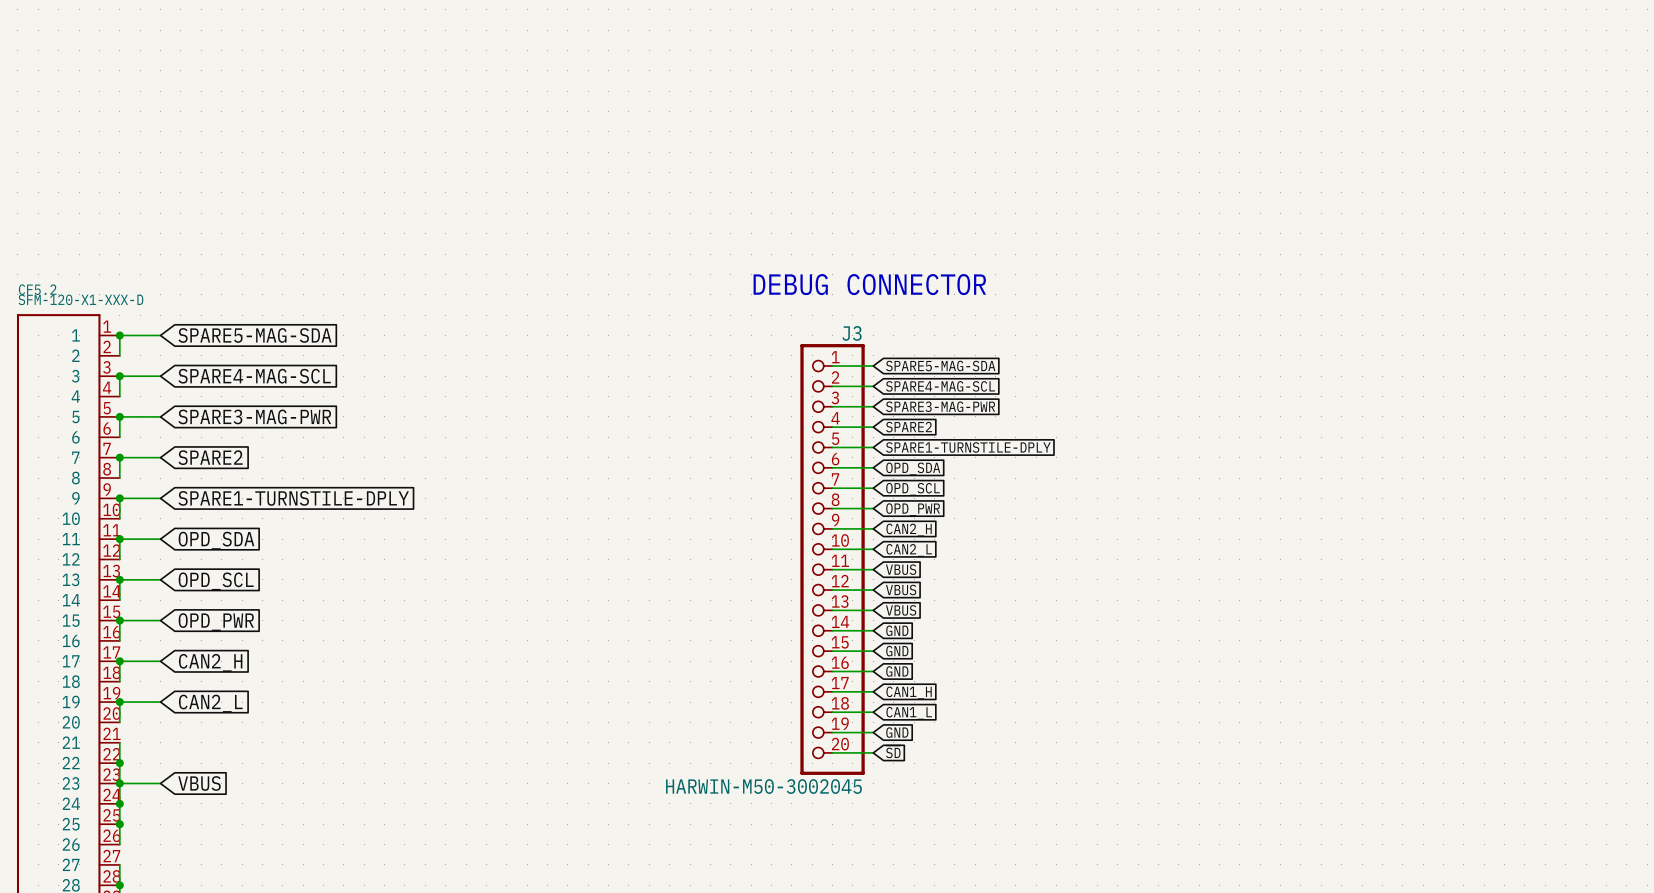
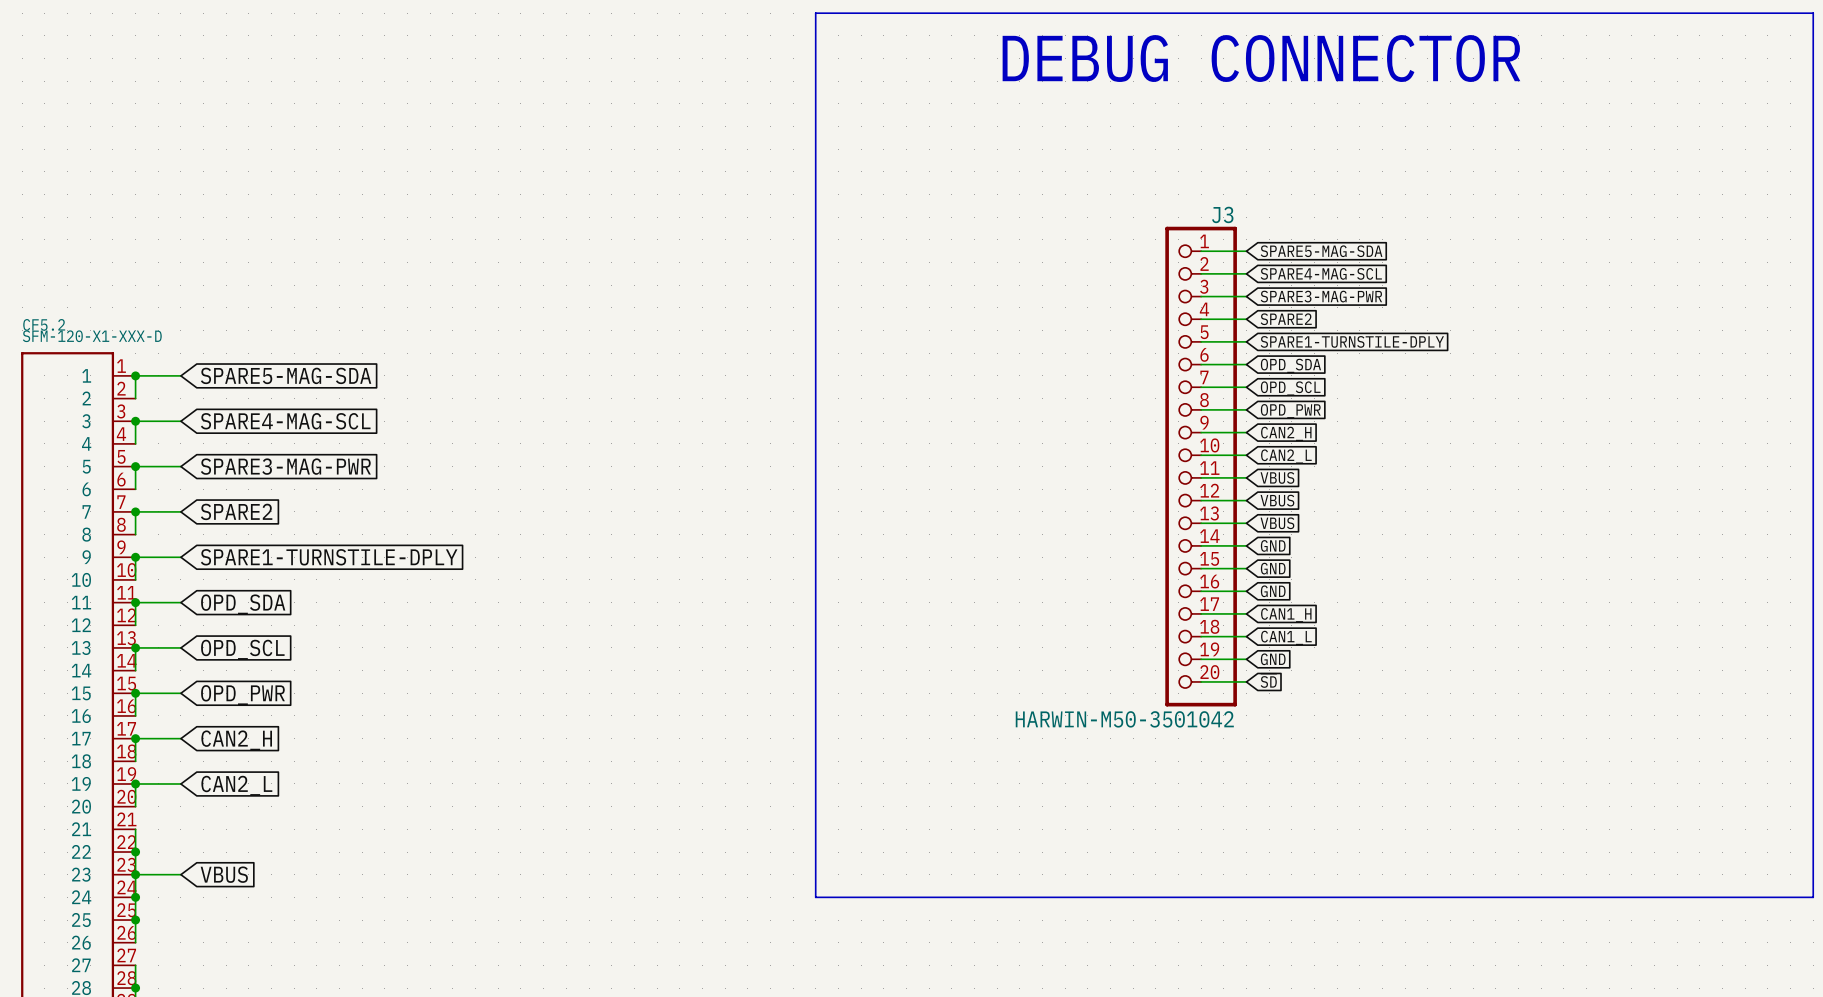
line: none -> (815, 13) (1813, 13) (1813, 897) (815, 897) (815, 13)
text: none -> DEBUG CONNECTOR (1261, 58)
wire: none -> (1201, 251) (1246, 251)
global label: none -> SPARE5-MAG-SDA (1321, 251)
wire: none -> (1201, 273) (1246, 273)
global label: none -> SPARE4-MAG-SCL (1321, 273)
wire: none -> (1201, 296) (1246, 296)
global label: none -> SPARE3-MAG-PWR (1321, 296)
text: DEBUG CONNECTOR (869, 284) -> none
wire: none -> (1201, 319) (1246, 319)
global label: none -> SPARE2 (1286, 319)
wire: none -> (1201, 341) (1246, 341)
global label: none -> SPARE1-TURNSTILE-DPLY (1352, 341)
wire: none -> (1201, 364) (1246, 364)
global label: none -> OPD_SDA (1290, 365)
wire: none -> (1201, 387) (1246, 387)
global label: none -> OPD_SCL (1290, 388)
wire: (832, 366) (873, 366) -> none
global label: SPARE5-MAG-SDA (940, 366) -> none
wire: none -> (1201, 409) (1246, 409)
global label: none -> OPD_PWR (1290, 411)
wire: (832, 386) (873, 386) -> none
global label: SPARE4-MAG-SCL (940, 386) -> none
wire: none -> (1201, 432) (1246, 432)
global label: none -> CAN2_H (1286, 433)
wire: (832, 406) (873, 406) -> none
global label: SPARE3-MAG-PWR (940, 406) -> none
wire: none -> (1201, 455) (1246, 455)
global label: none -> CAN2_L (1286, 456)
wire: (832, 427) (873, 427) -> none
global label: SPARE2 (909, 427) -> none
wire: none -> (1201, 477) (1246, 477)
global label: none -> VBUS (1277, 477)
wire: (832, 447) (873, 447) -> none
global label: SPARE1-TURNSTILE-DPLY (968, 447) -> none
wire: none -> (1201, 500) (1246, 500)
global label: none -> VBUS (1277, 500)
wire: (832, 467) (873, 467) -> none
wire: none -> (1201, 523) (1246, 523)
global label: none -> VBUS (1277, 523)
global label: OPD_SDA (913, 468) -> none
wire: (832, 488) (873, 488) -> none
wire: none -> (1201, 545) (1246, 545)
global label: none -> GND (1273, 545)
global label: OPD_SCL (913, 489) -> none
wire: (832, 508) (873, 508) -> none
wire: none -> (1201, 568) (1246, 568)
global label: none -> GND (1273, 568)
global label: OPD_PWR (913, 509) -> none
wire: (832, 528) (873, 528) -> none
wire: none -> (1201, 591) (1246, 591)
global label: none -> GND (1273, 591)
global label: CAN2_H (909, 530) -> none
wire: (832, 549) (873, 549) -> none
wire: none -> (1201, 613) (1246, 613)
global label: CAN2_L (909, 550) -> none
global label: none -> CAN1_H (1286, 615)
J3 position: (832, 559) -> (1201, 466)
wire: (832, 569) (873, 569) -> none
global label: VBUS (901, 569) -> none
wire: none -> (1201, 636) (1246, 636)
global label: none -> CAN1_L (1286, 637)
wire: (832, 590) (873, 590) -> none
global label: VBUS (901, 590) -> none
wire: none -> (1201, 659) (1246, 659)
global label: none -> GND (1273, 659)
global label: none -> ~{SD} (1268, 680)
wire: (832, 610) (873, 610) -> none
global label: VBUS (901, 610) -> none
wire: none -> (1201, 681) (1246, 681)
wire: (832, 630) (873, 630) -> none
global label: GND (897, 630) -> none
wire: (832, 651) (873, 651) -> none
global label: GND (897, 651) -> none
wire: (832, 671) (873, 671) -> none
global label: GND (897, 671) -> none
wire: (832, 691) (873, 691) -> none
global label: CAN1_H (909, 692) -> none
wire: (832, 712) (873, 712) -> none
global label: CAN1_L (909, 713) -> none
wire: (832, 732) (873, 732) -> none
global label: GND (897, 732) -> none
global label: ~{SD} (893, 751) -> none
wire: (832, 752) (873, 752) -> none
J3 value: HARWIN-M50-3002045 (763, 786) -> HARWIN-M50-3501042 (1124, 719)

